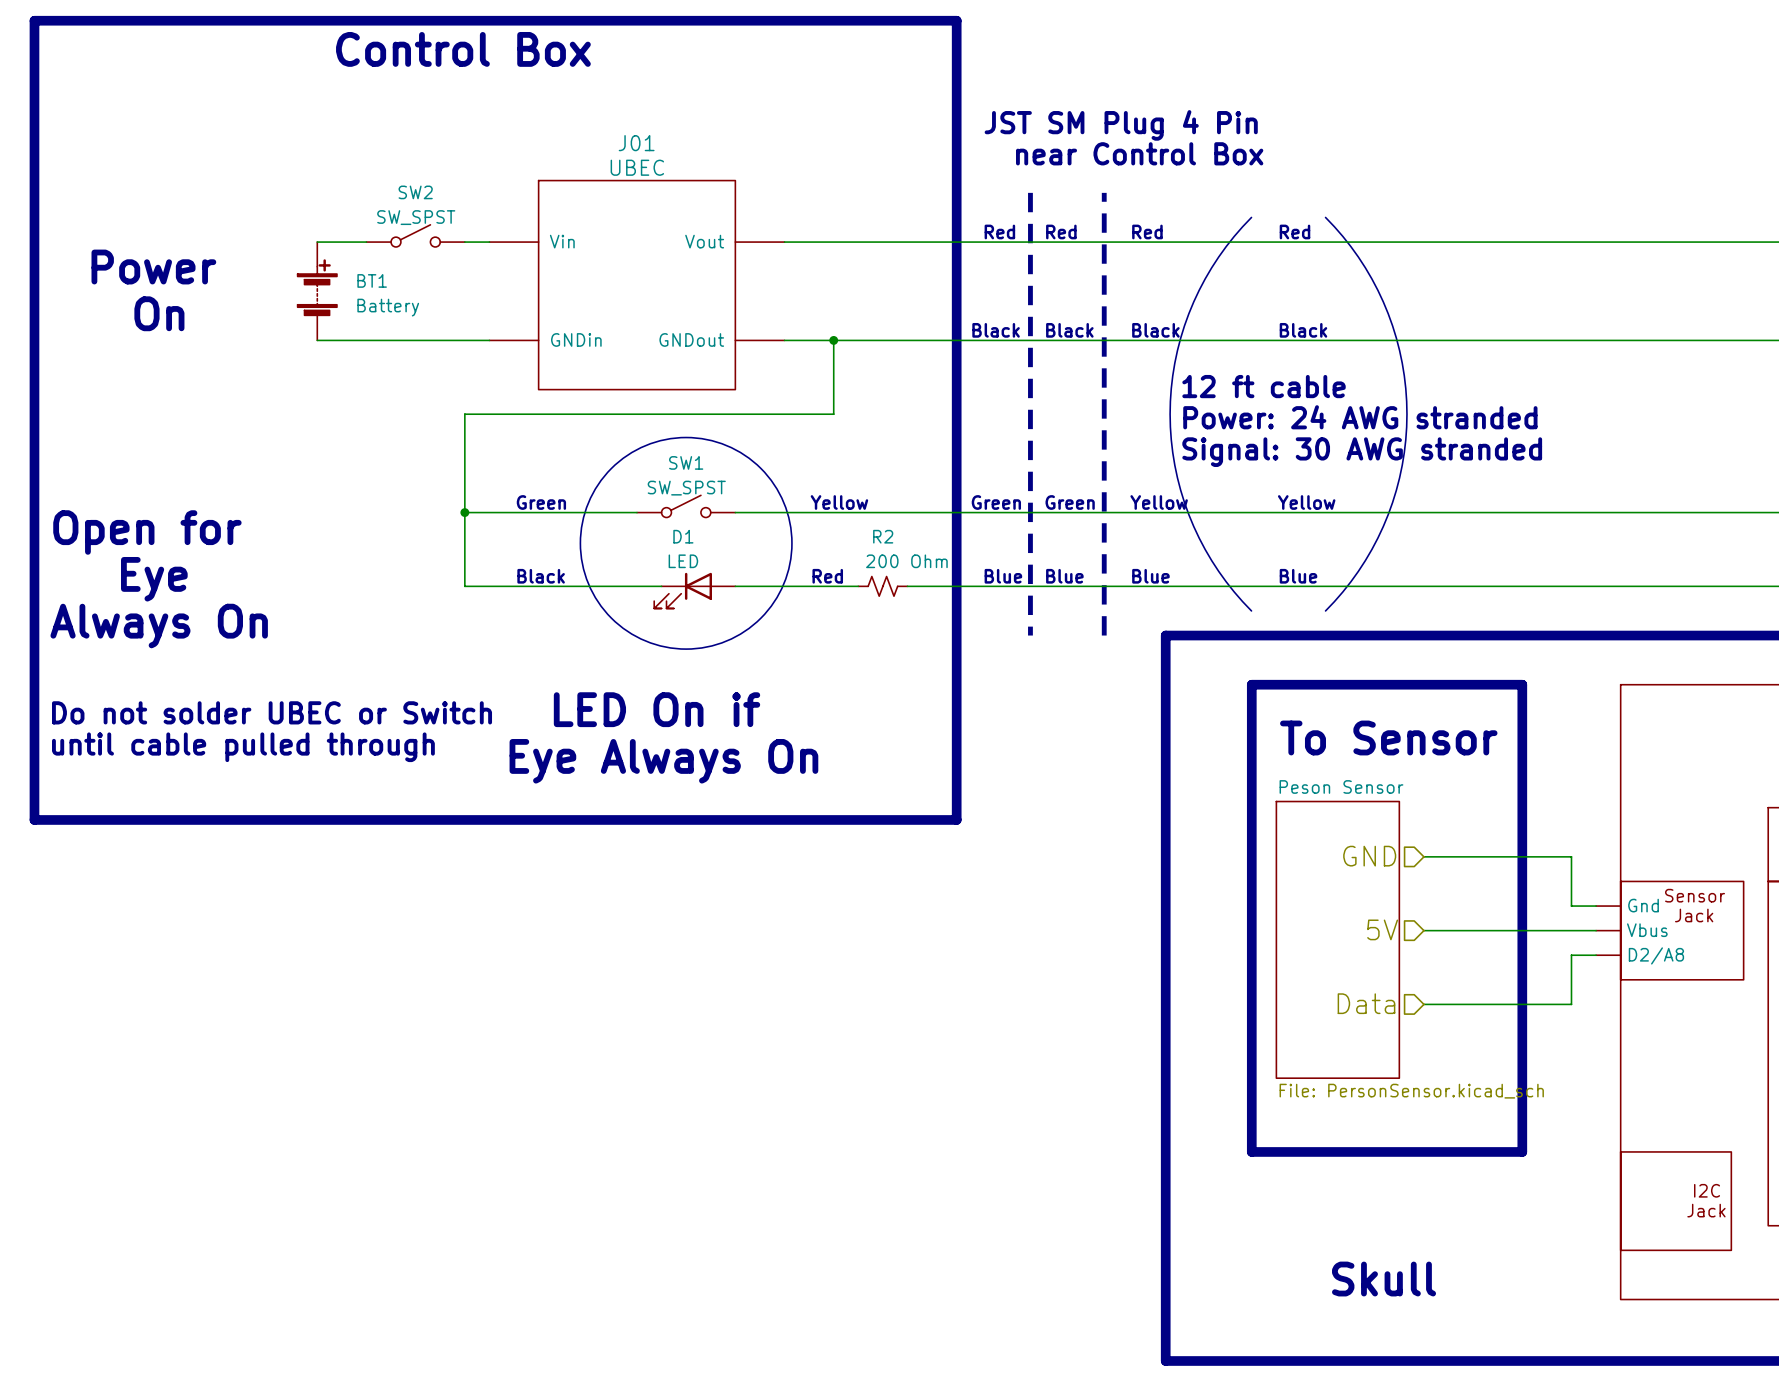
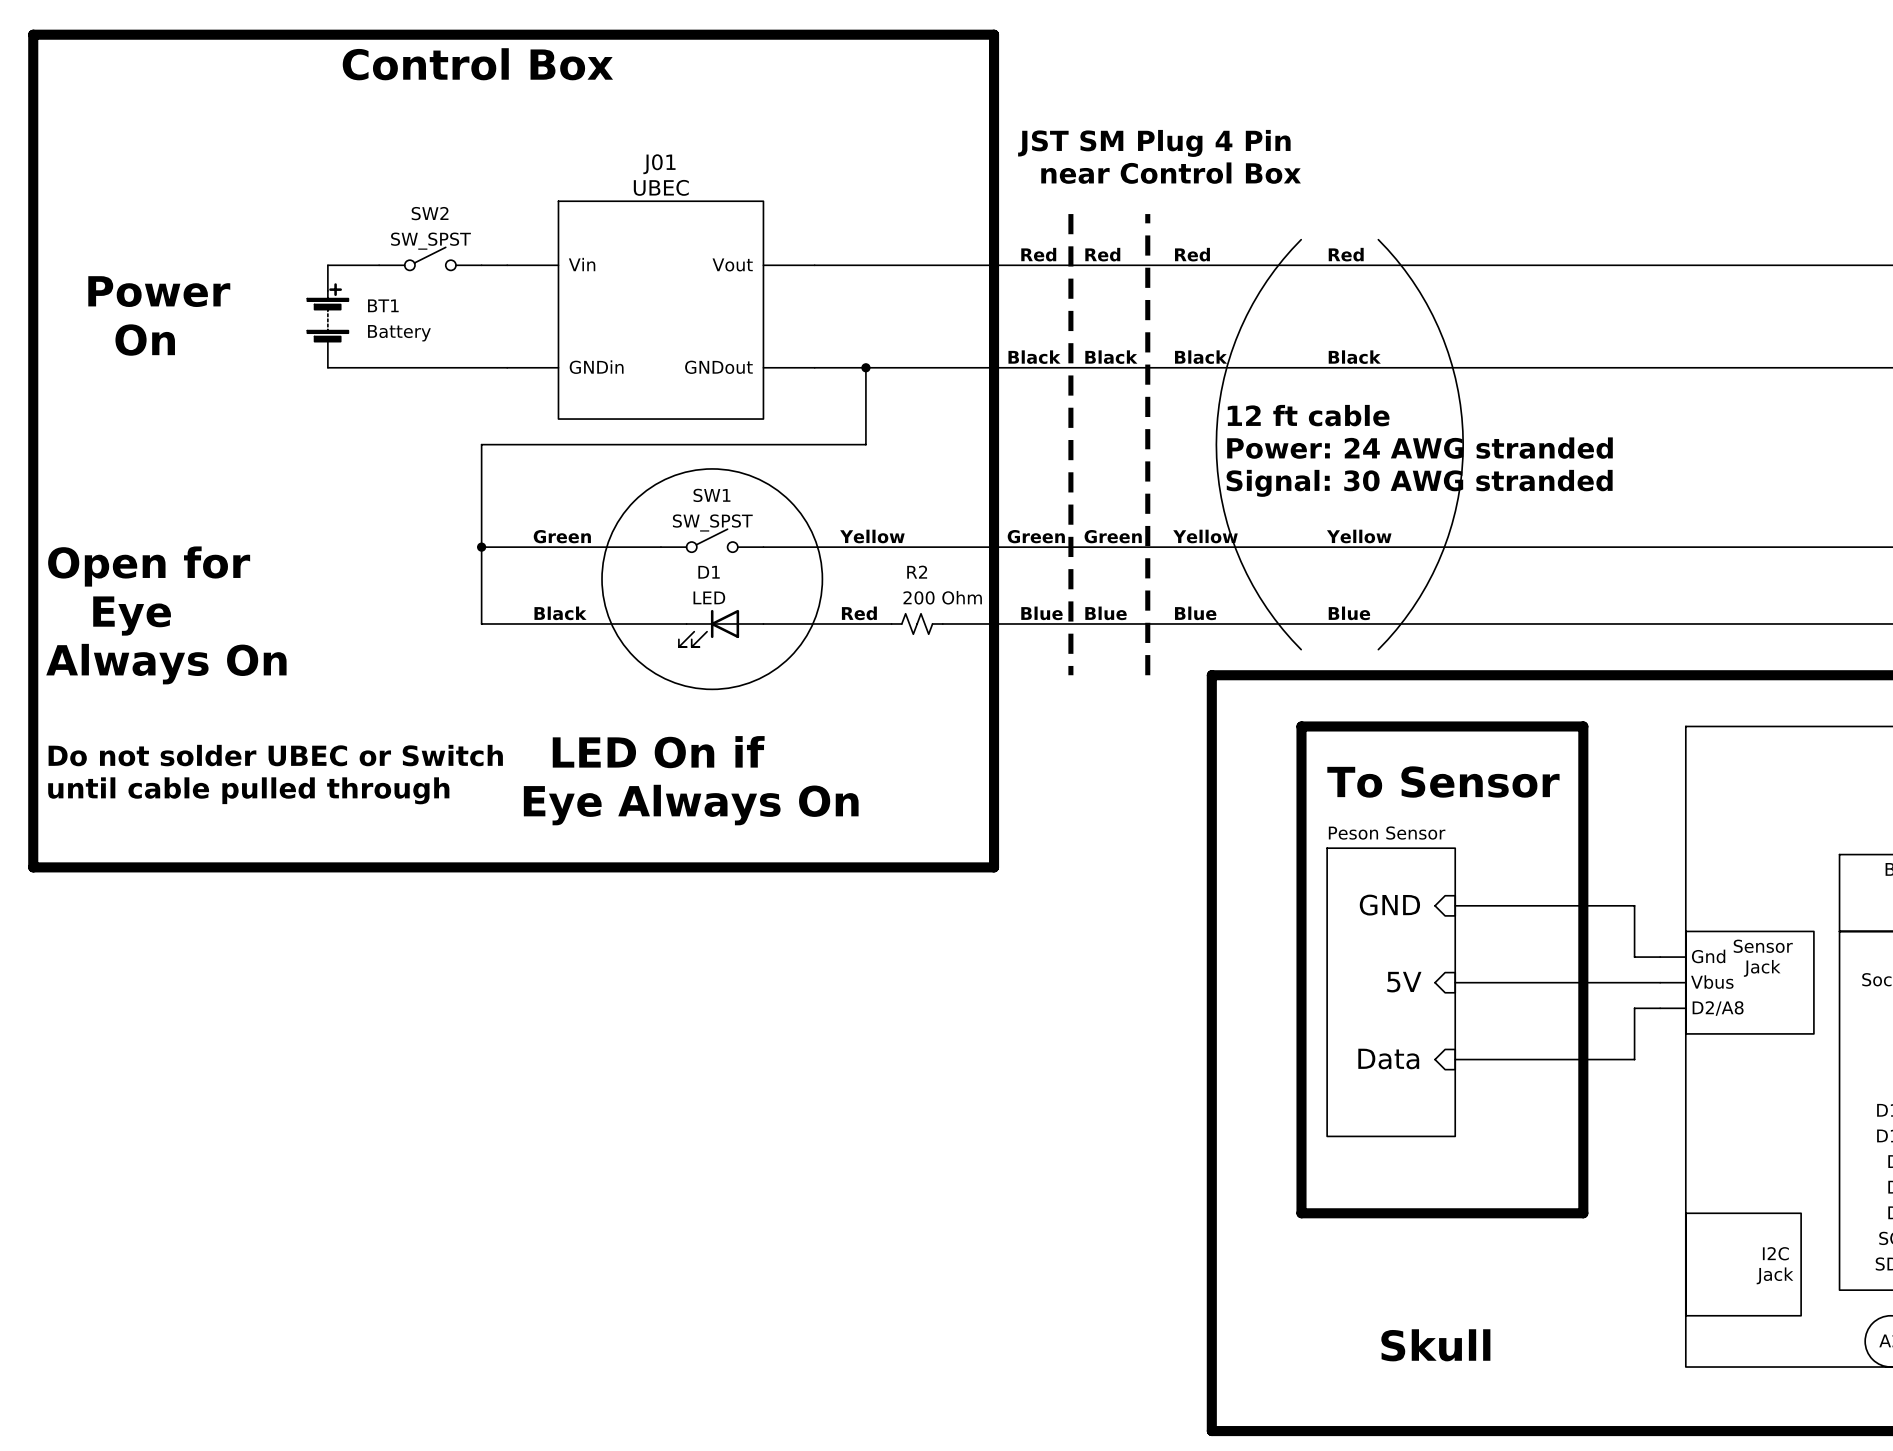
sheet pin: none -> GND (1389, 905)
hierarchical label: GND (1369, 856) -> none
wire: none -> (1455, 905) (1480, 905)
sheet pin: none -> 5V (1404, 982)
hierarchical label: 5V (1382, 929) -> none
wire: none -> (1455, 982) (1480, 982)
sheet pin: none -> Data (1388, 1058)
hierarchical label: Data (1366, 1003) -> none
wire: none -> (1455, 1059) (1480, 1059)
sheet Peson Sensor value: File: PersonSensor.kicad_sch (1411, 1091) -> none

